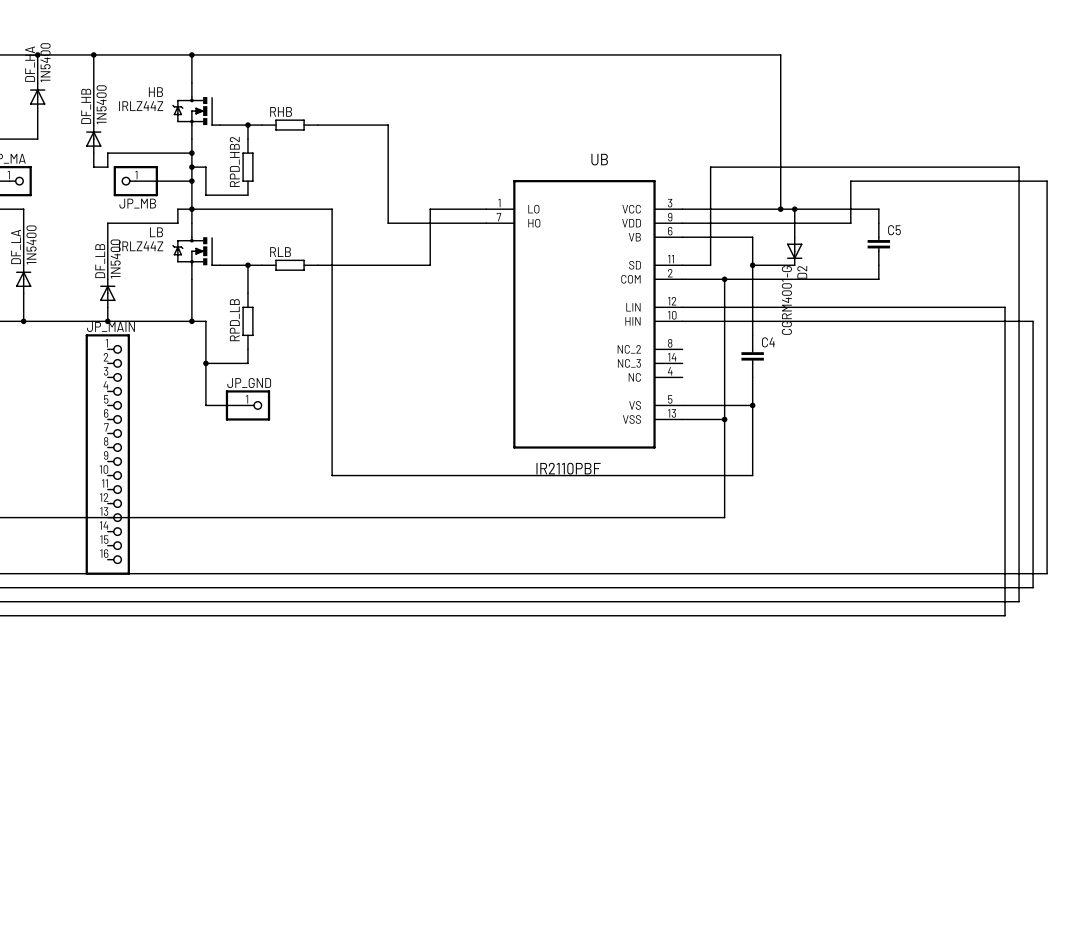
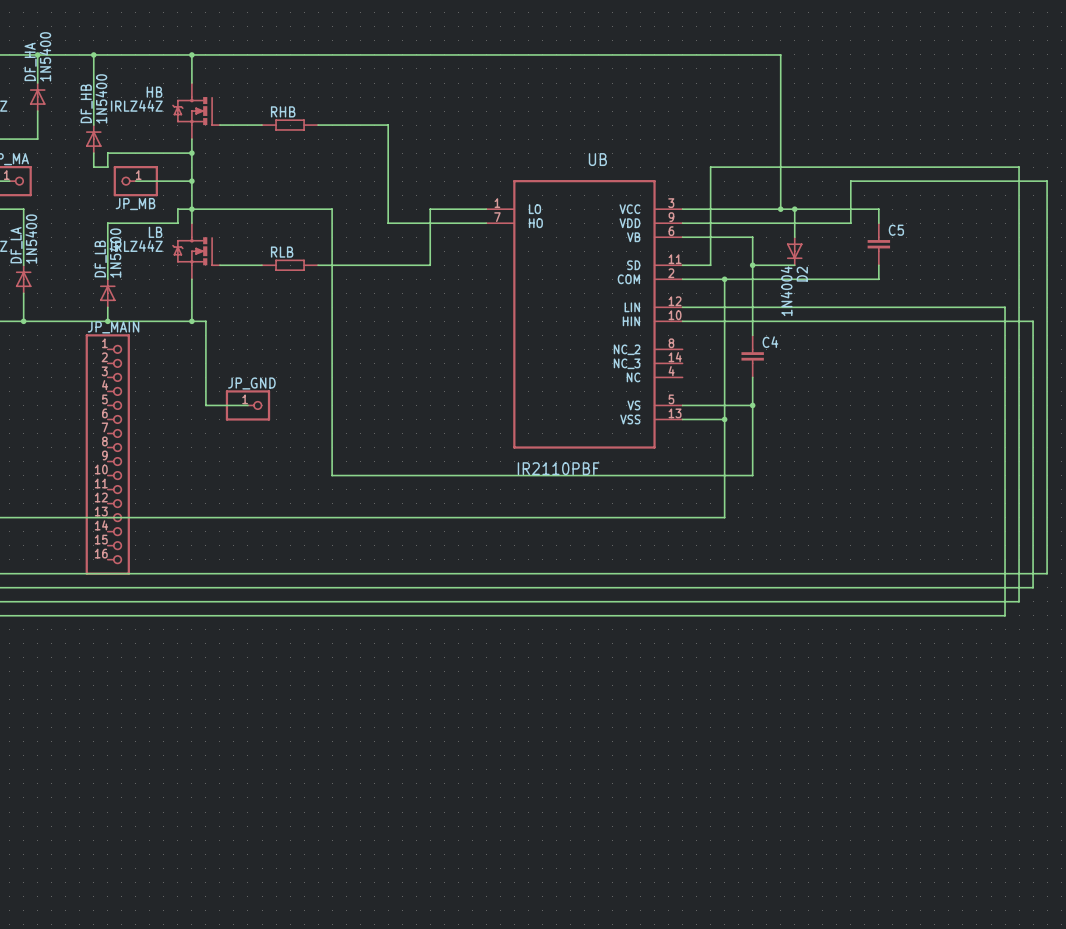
wire: (247, 125) (247, 139) -> none
junction: (247, 125) -> none
wire: (191, 167) (205, 167) (205, 195) (247, 195) -> none
junction: (191, 167) -> none
RPD_HB2: (247, 167) -> none
wire: (247, 265) (247, 293) -> none
junction: (247, 265) -> none
D2 value: CGRM4001-G (786, 300) -> 1N4004 (786, 291)
RPD_LB: (247, 321) -> none
wire: (247, 349) (247, 363) (205, 363) -> none
junction: (205, 363) -> none

